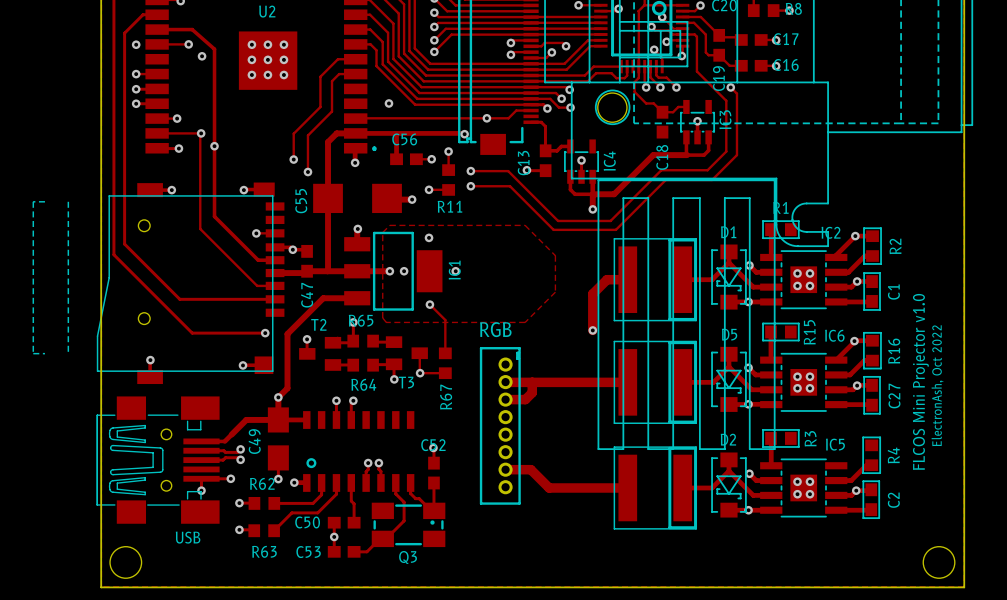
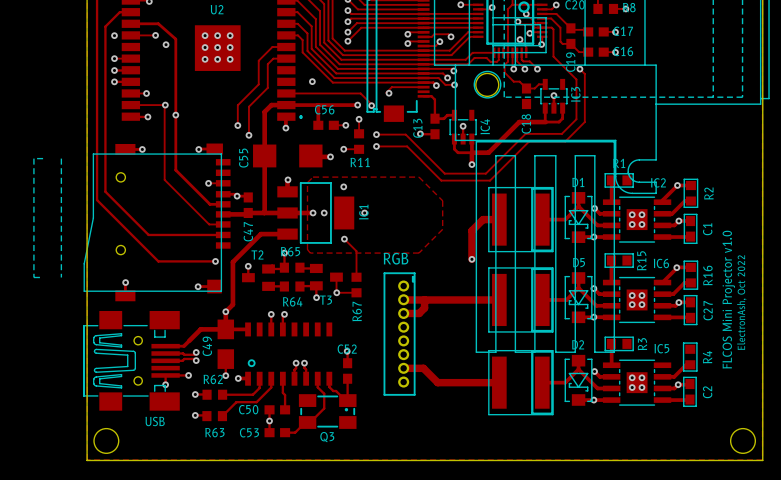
track: (516, 110) (508, 118) (355, 118) -> (372, 105) (360, 93) (286, 93)
track: none -> (412, 87) (391, 87) (386, 92)
track: (446, 133) (464, 134) -> none
via: none -> (357, 105)

